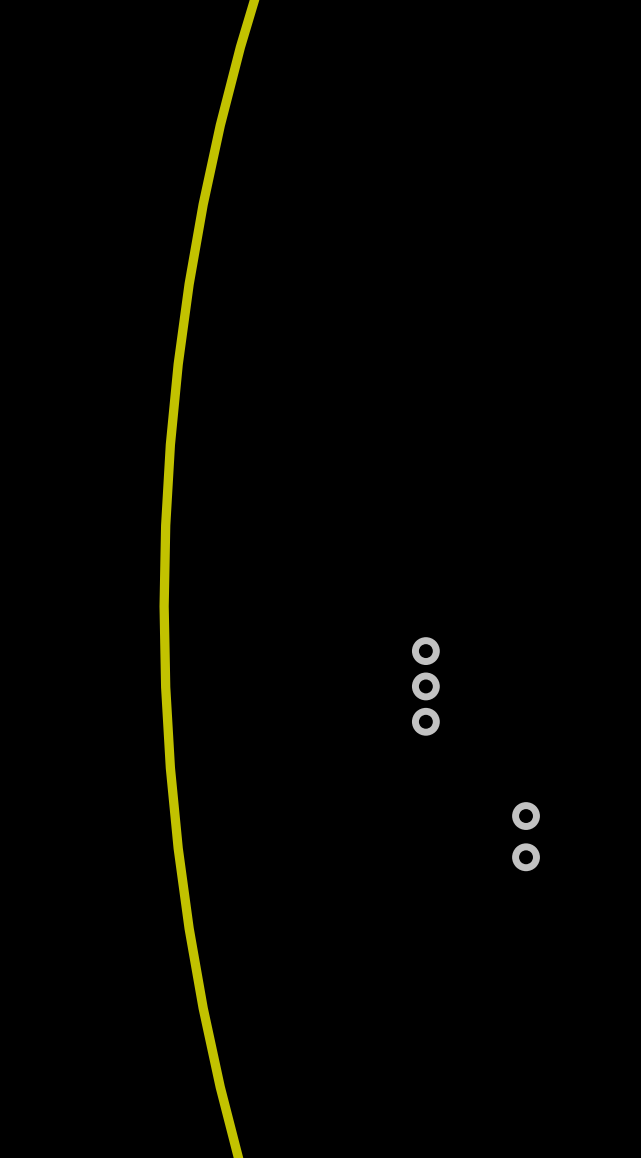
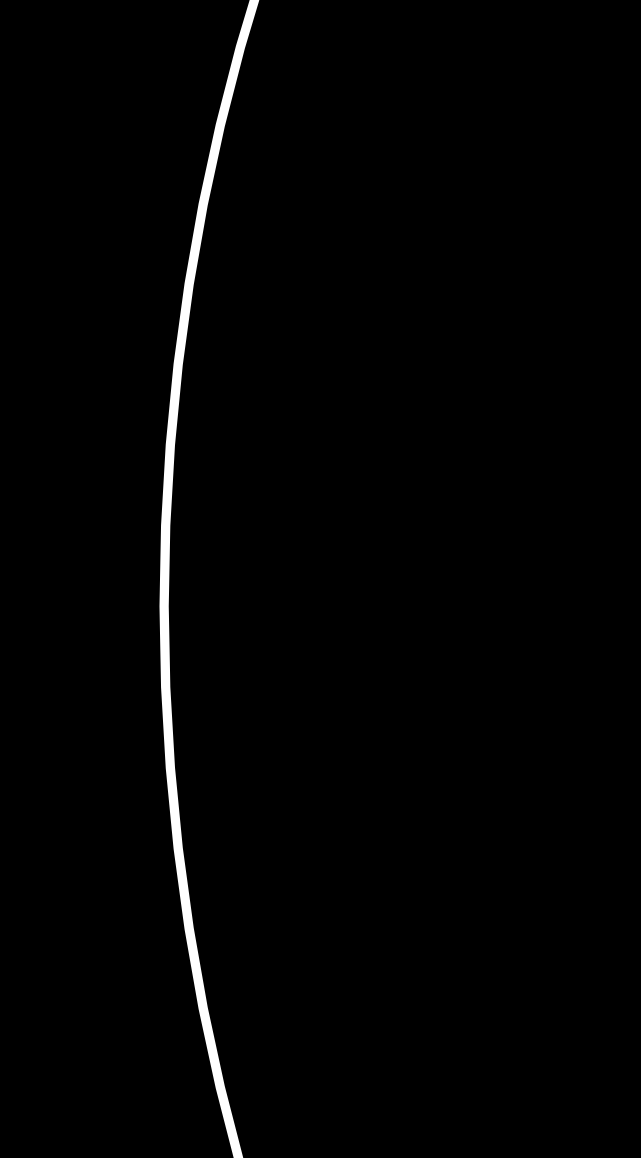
via: (425, 651) -> none
via: (425, 686) -> none
via: (425, 721) -> none
via: (526, 816) -> none
via: (526, 857) -> none

